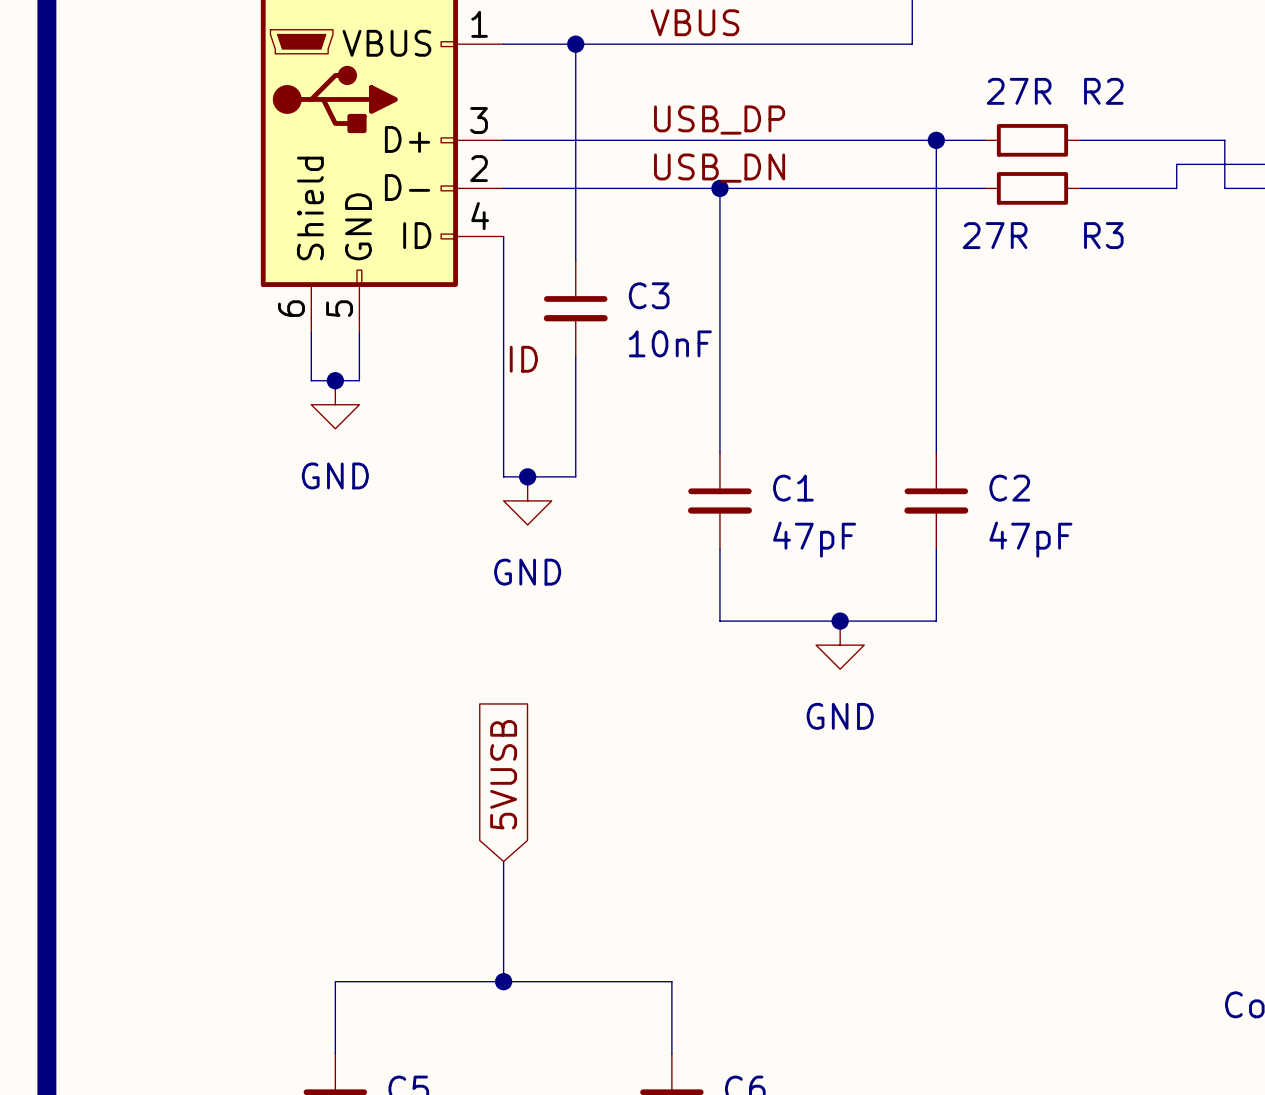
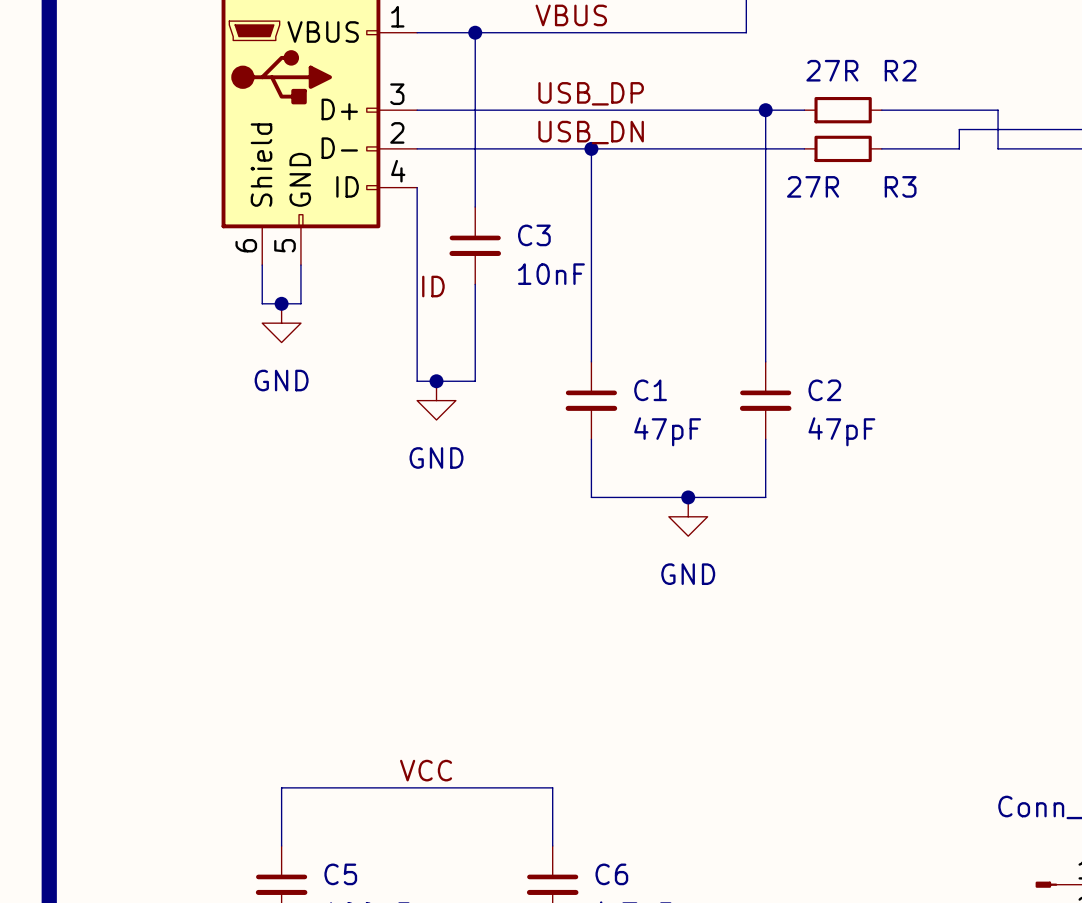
global label: 5VUSB (503, 774) -> none
wire: (503, 861) (503, 981) -> none
label: none -> VCC (426, 770)
junction: (503, 981) -> none

